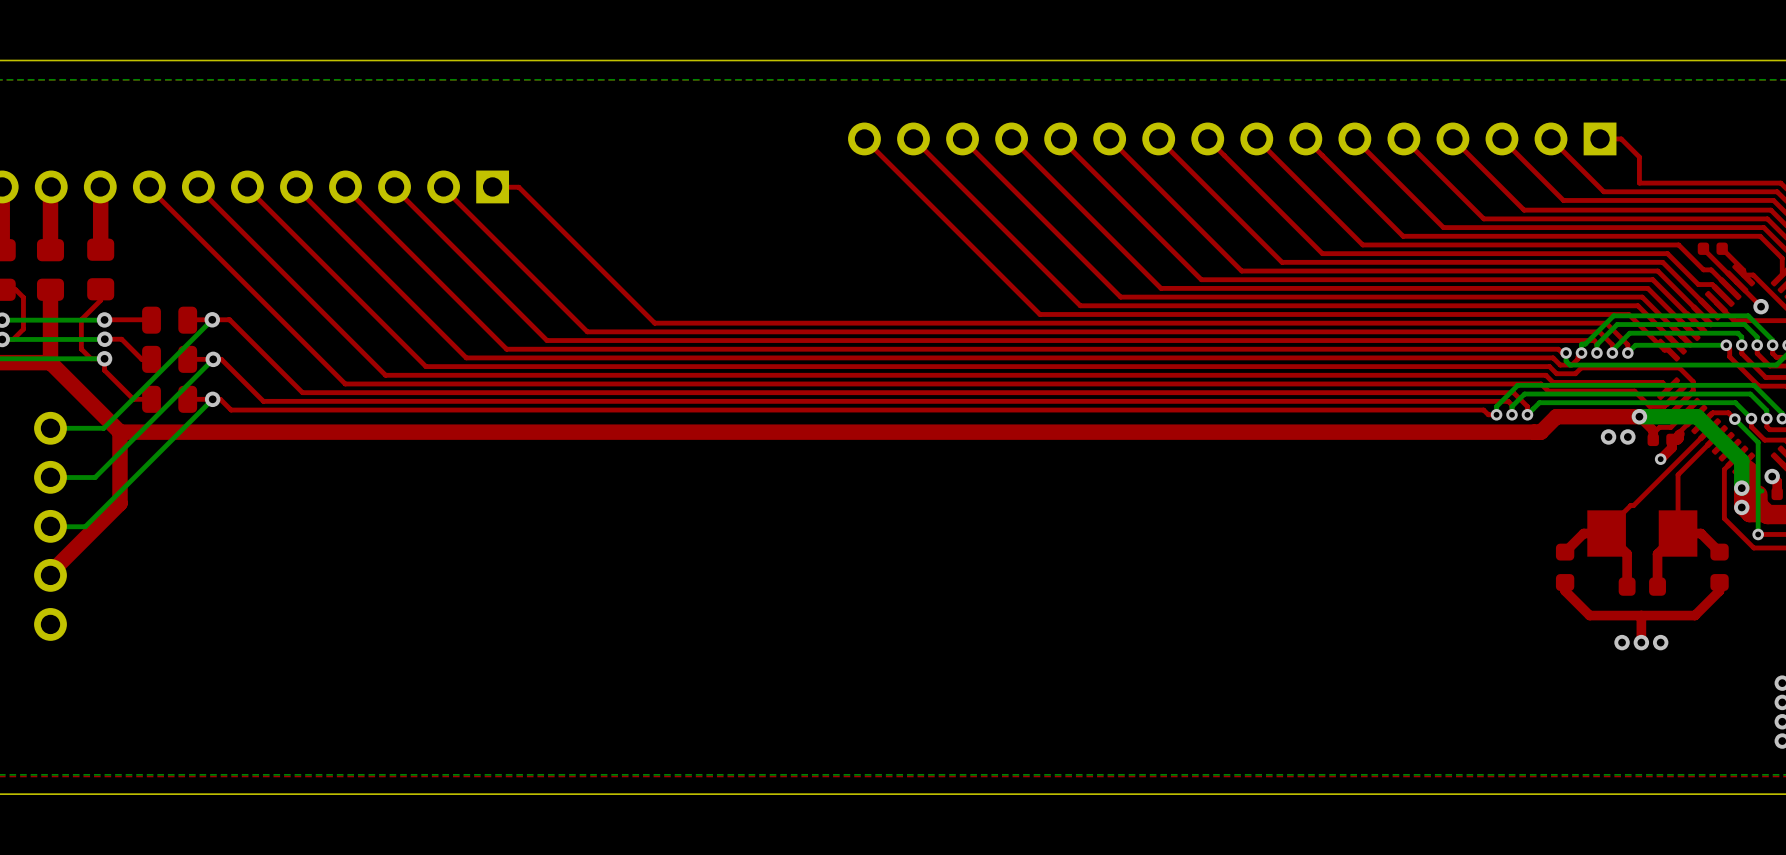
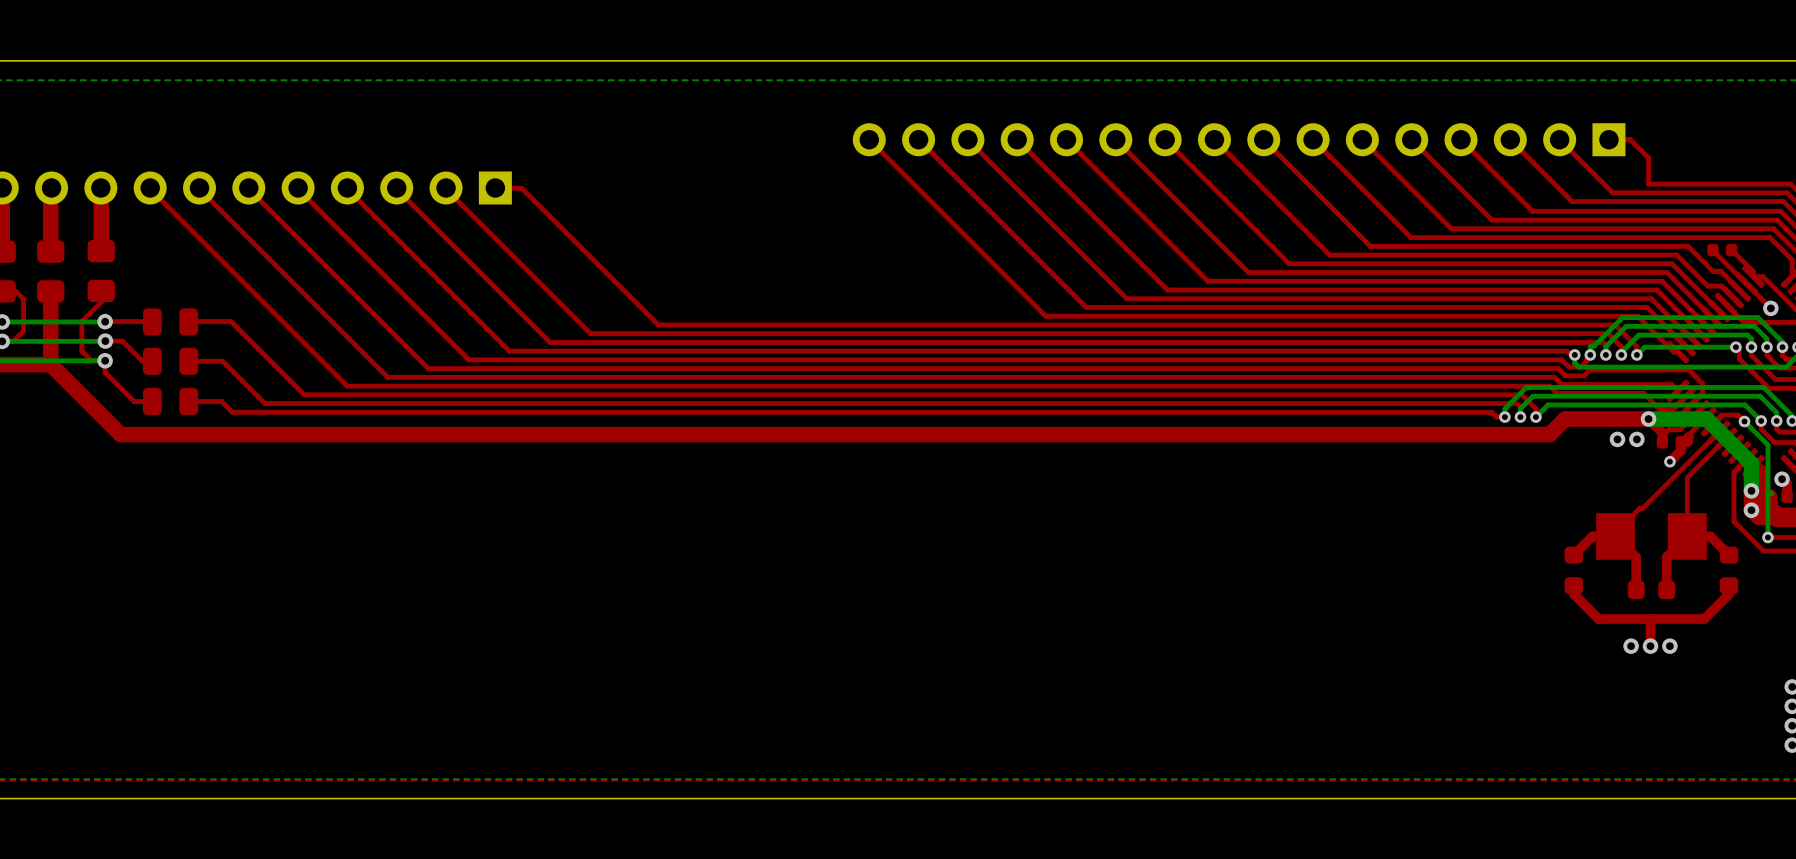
bottom track: (212, 319) (103, 428) (49, 428) -> none
via: (212, 319) -> none
bottom track: (213, 359) (95, 477) (49, 477) -> none
via: (213, 359) -> none
bottom track: (212, 399) (85, 526) (49, 526) -> none
via: (212, 399) -> none
top track: (120, 432) (120, 503) (49, 574) -> none
part: (50, 526) -> none

